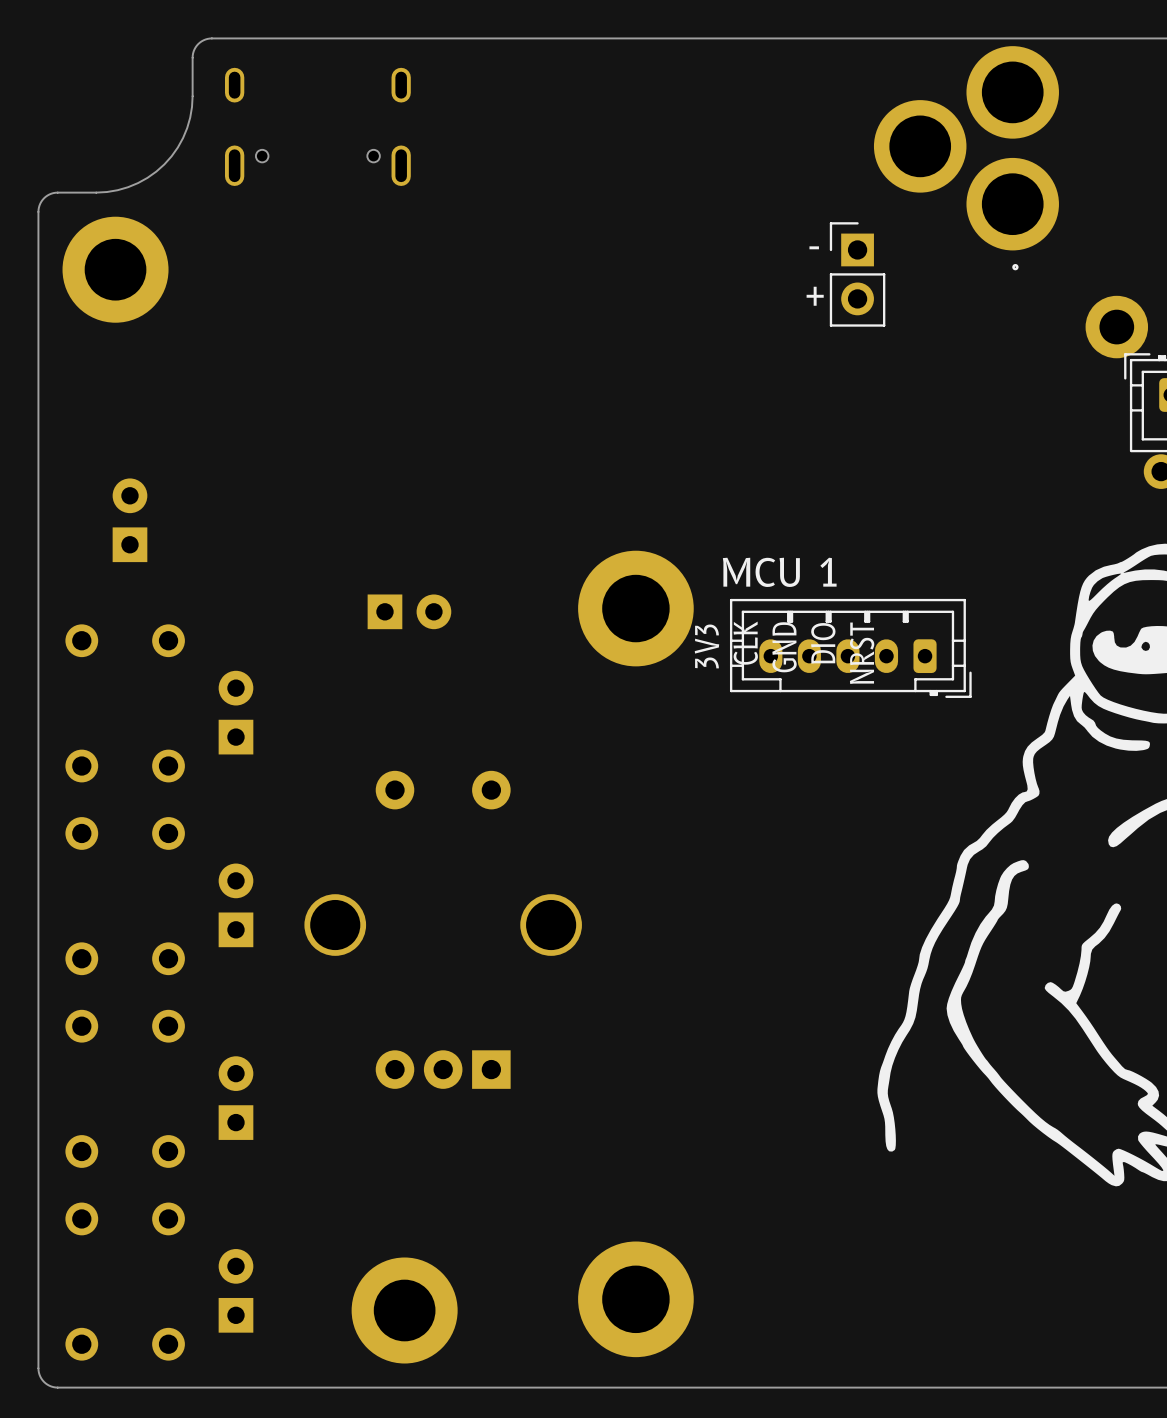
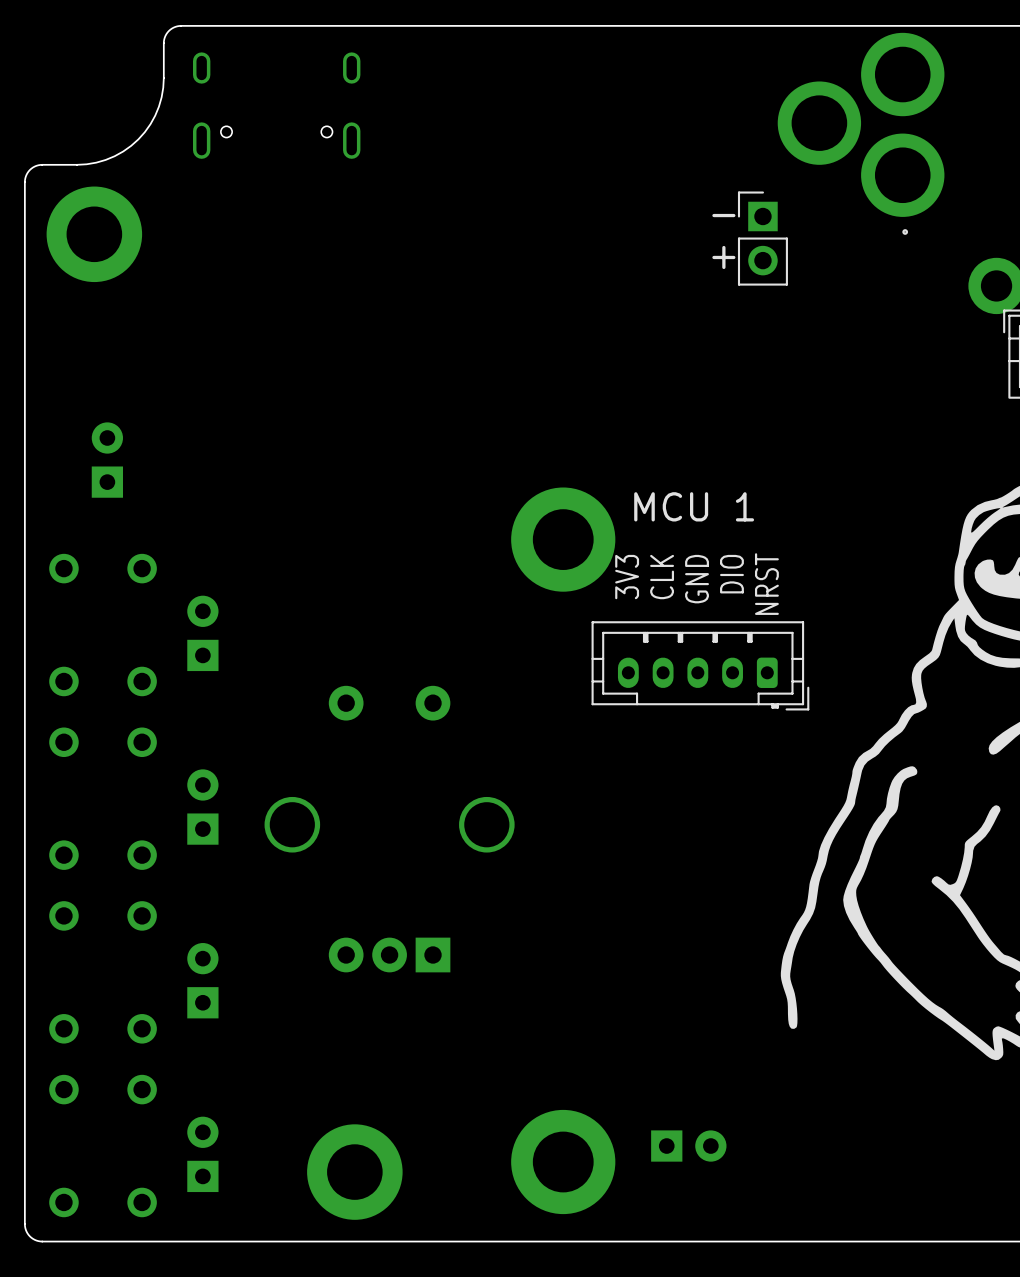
part: (409, 611) -> none
part position: (850, 648) -> (700, 665)
part: none -> (688, 1146)

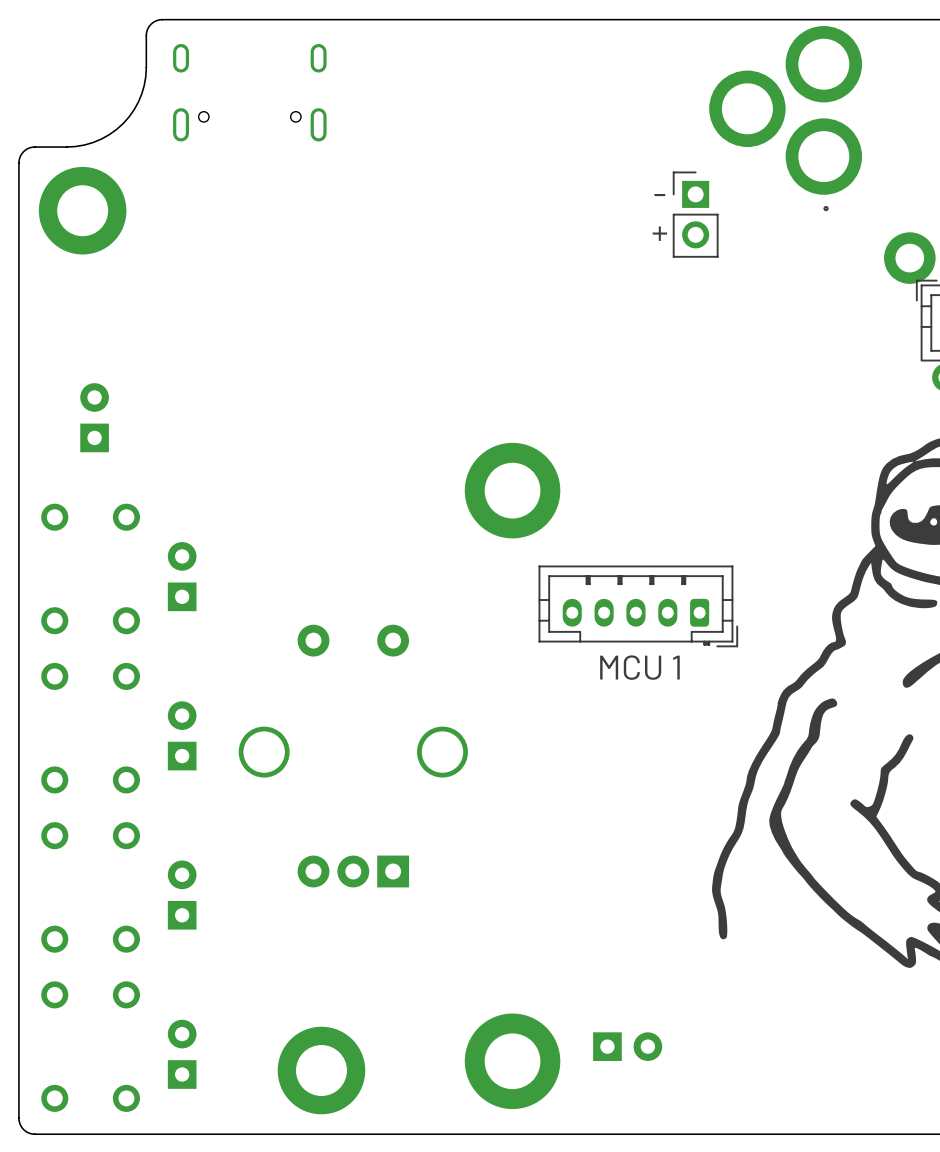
text position: MCU 1 (694, 506) -> MCU 1 (639, 667)
text: DIO (731, 574) -> none
text: 3V3 (627, 577) -> none
text: CLK (662, 577) -> none
text: GND (697, 579) -> none
text: NRST (766, 584) -> none

